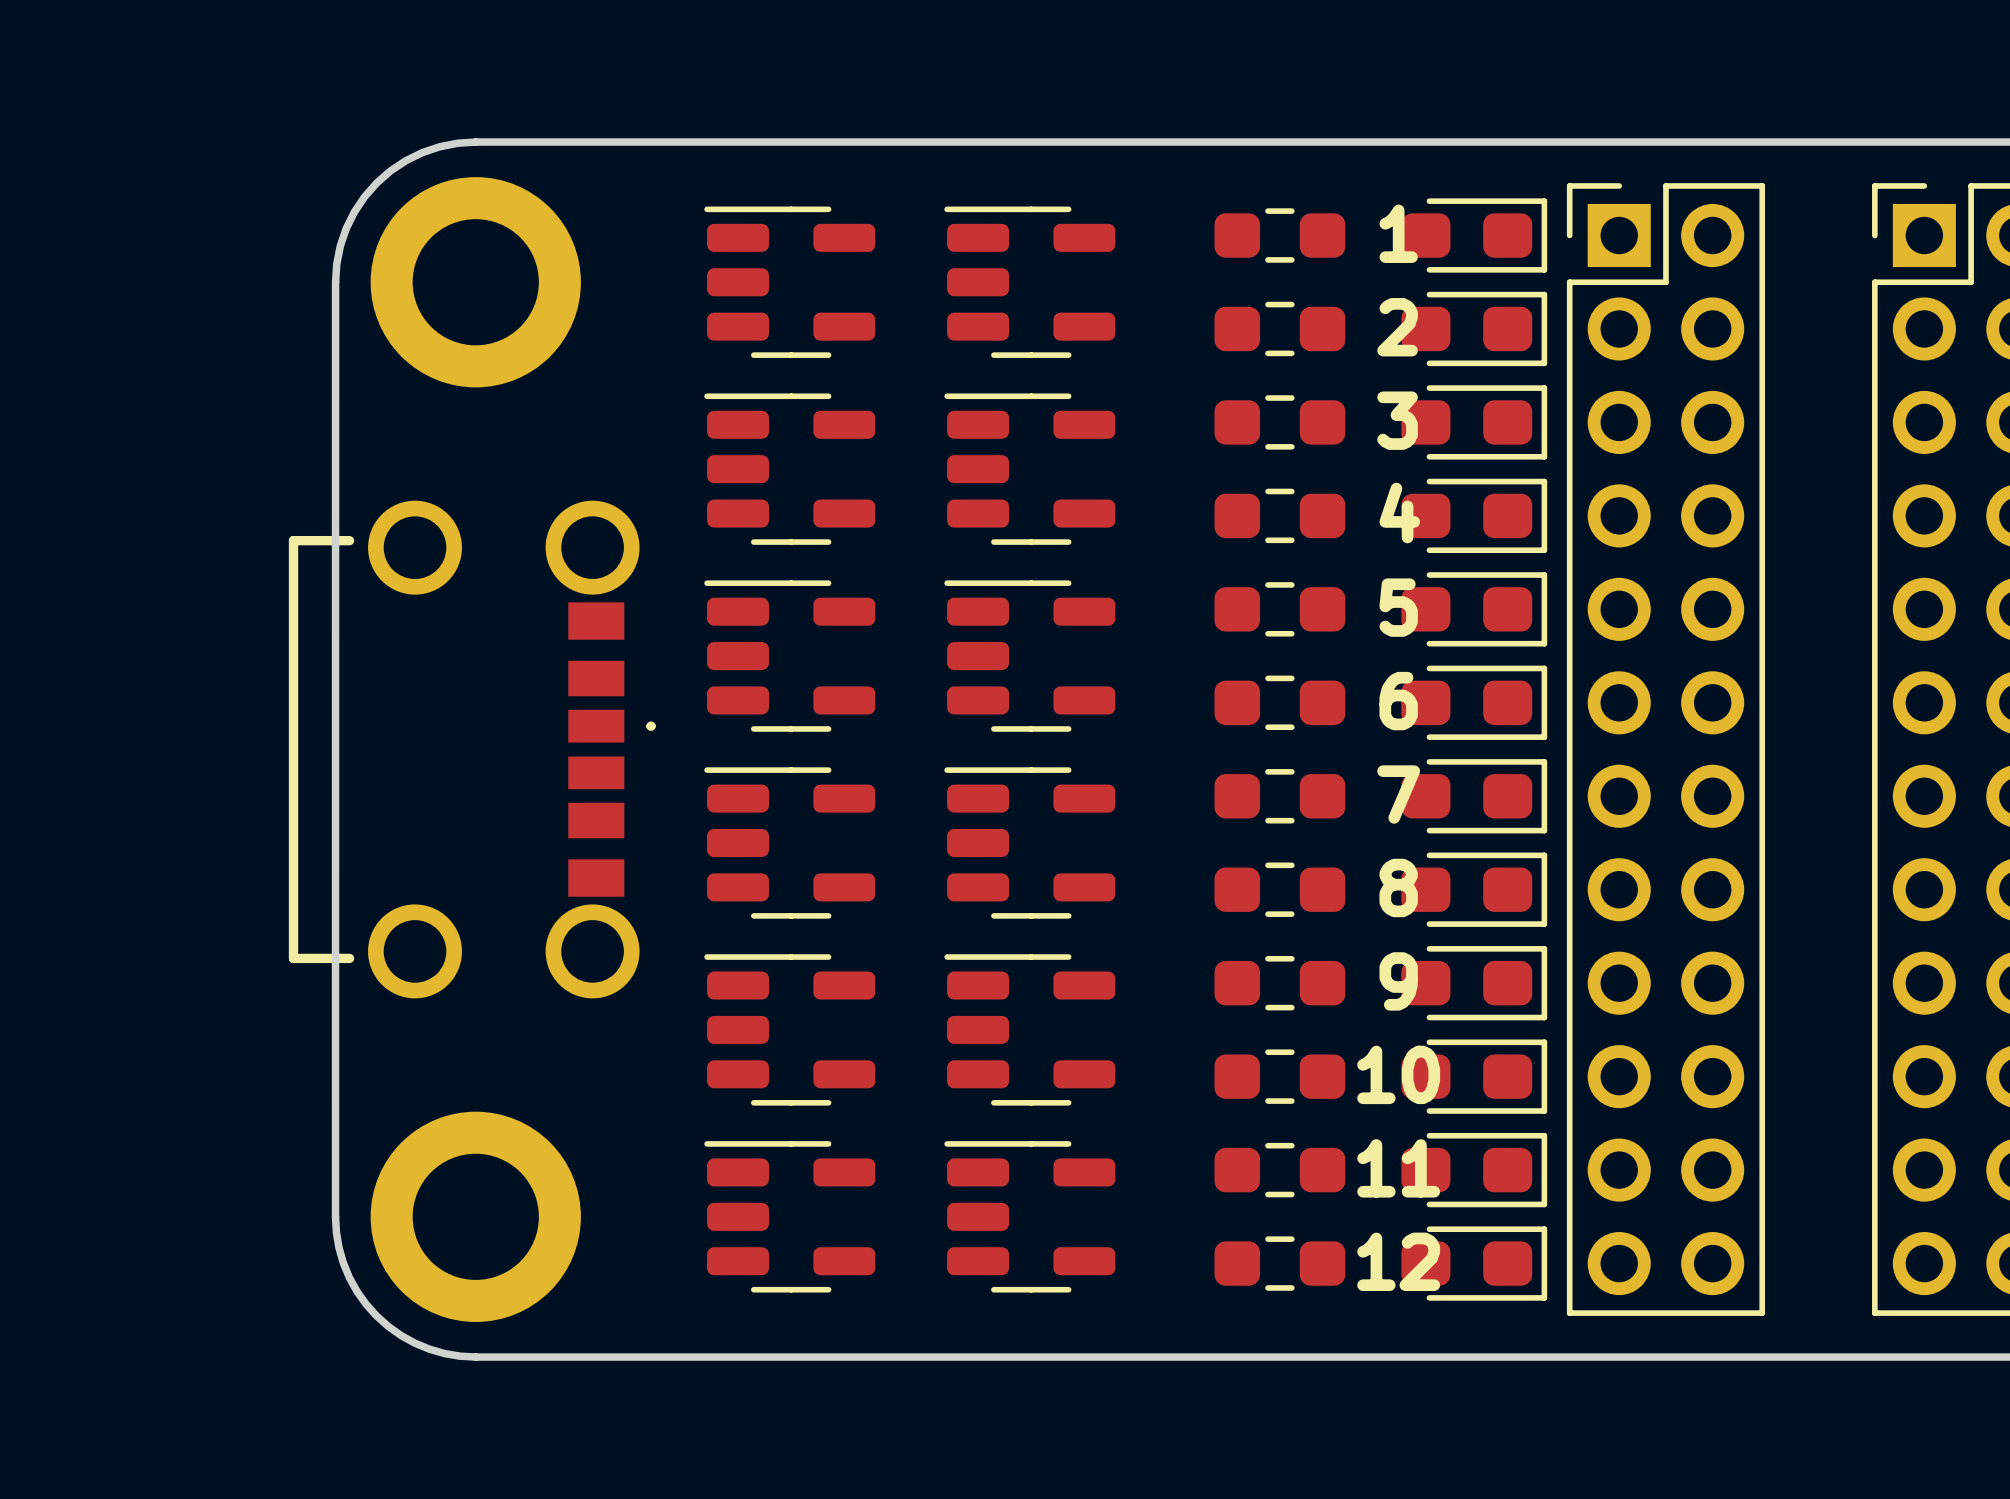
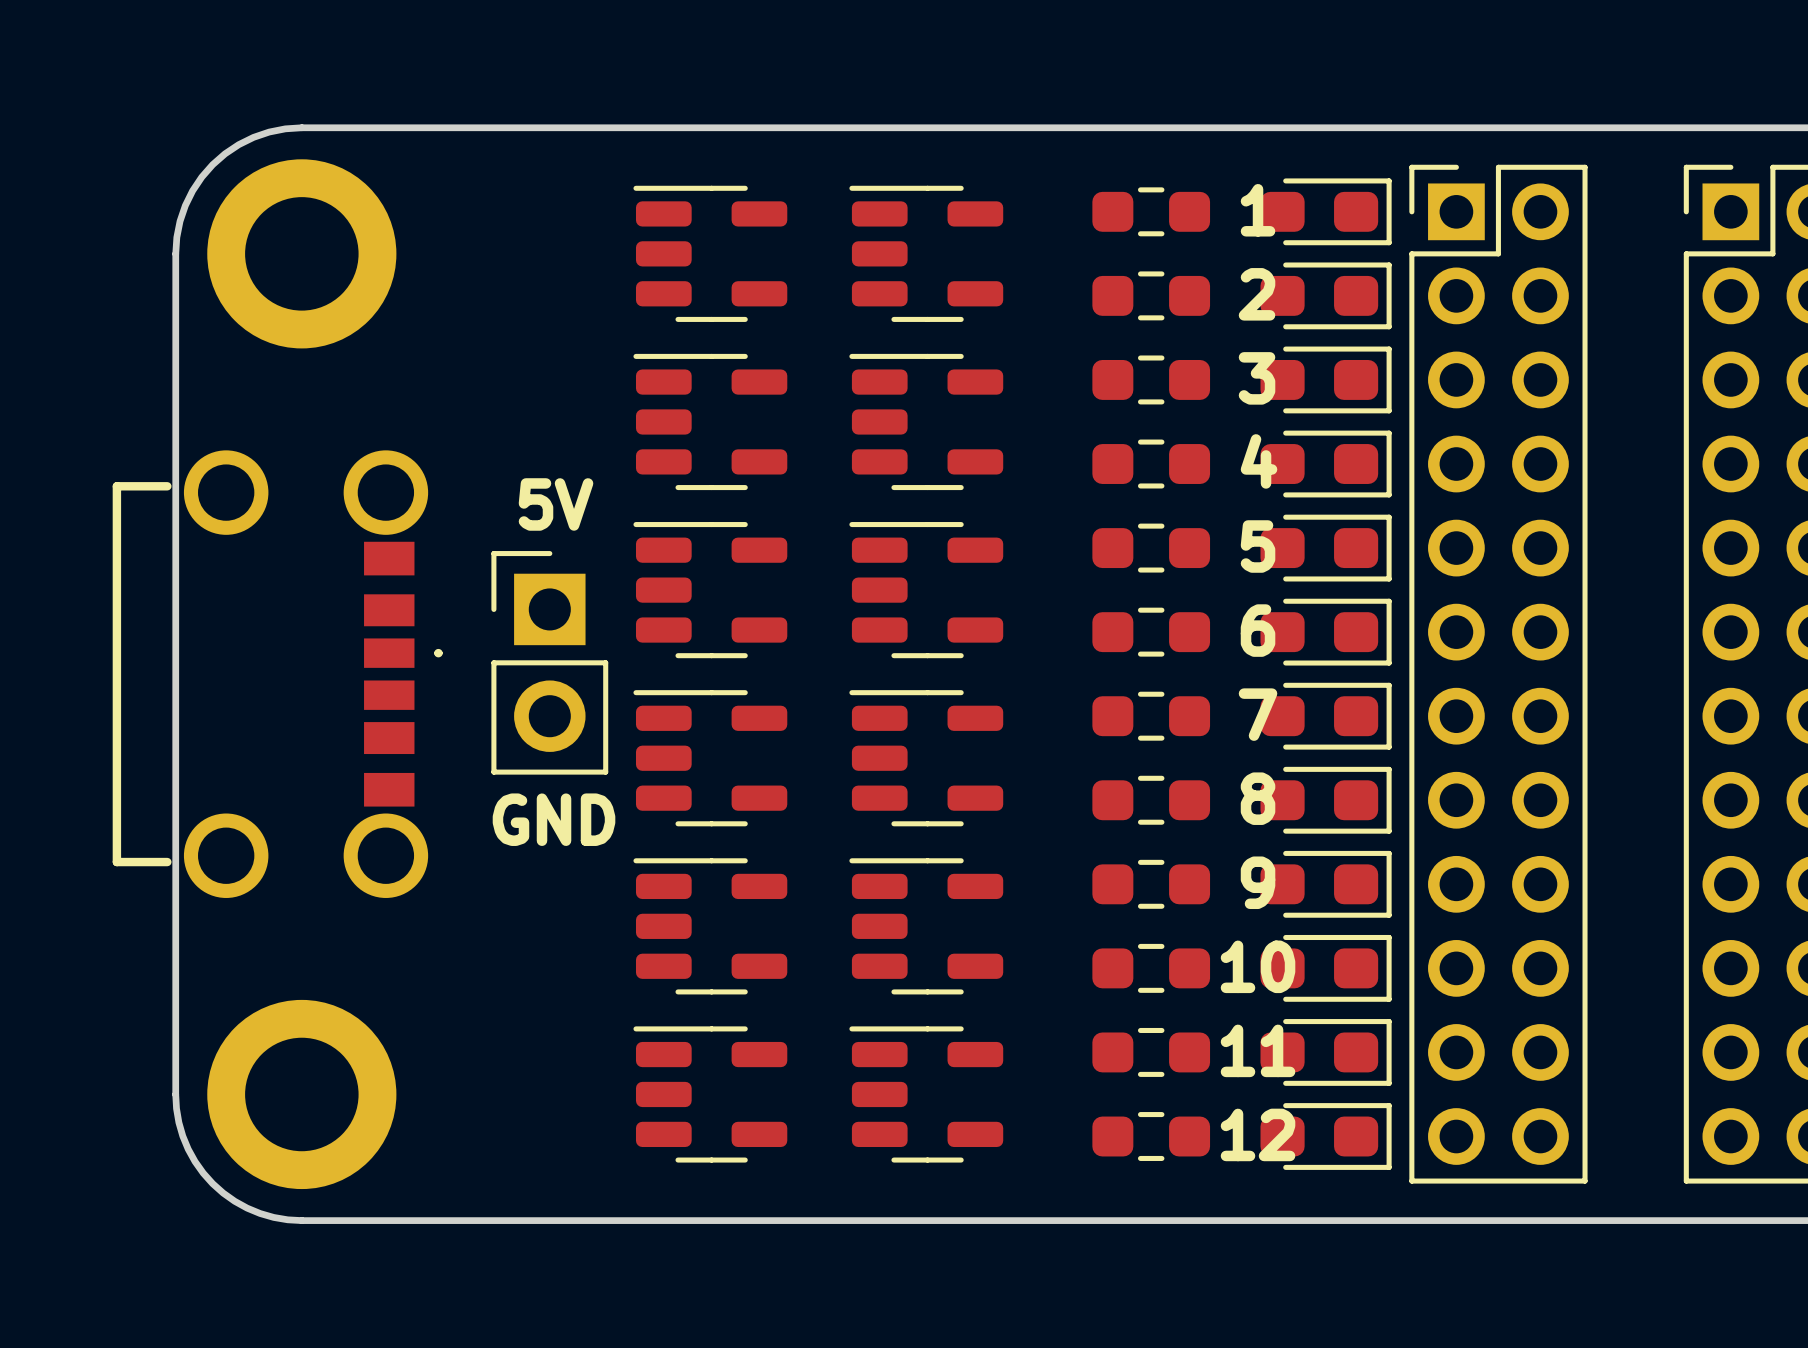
board edge: (475, 142) (439, 146) (422, 152) (405, 160) (376, 183) (354, 212) (340, 245) (336, 263) (335, 1216) (339, 1248) (349, 1277) (357, 1291) (376, 1315) (388, 1326) (414, 1343) (444, 1353) (475, 1357) -> (427, 127) (301, 127) (269, 132) (253, 137) (238, 144) (212, 164) (192, 190) (180, 221) (175, 253) (175, 1094) (178, 1122) (182, 1136) (195, 1161) (203, 1173) (223, 1193) (247, 1208) (260, 1213) (287, 1219) (427, 1220)
part position: (475, 282) -> (301, 253)
text: none -> 5V (556, 504)
part: none -> (549, 662)
part position: (472, 749) -> (277, 674)
text: none -> GND (554, 819)
part position: (475, 1216) -> (301, 1094)

